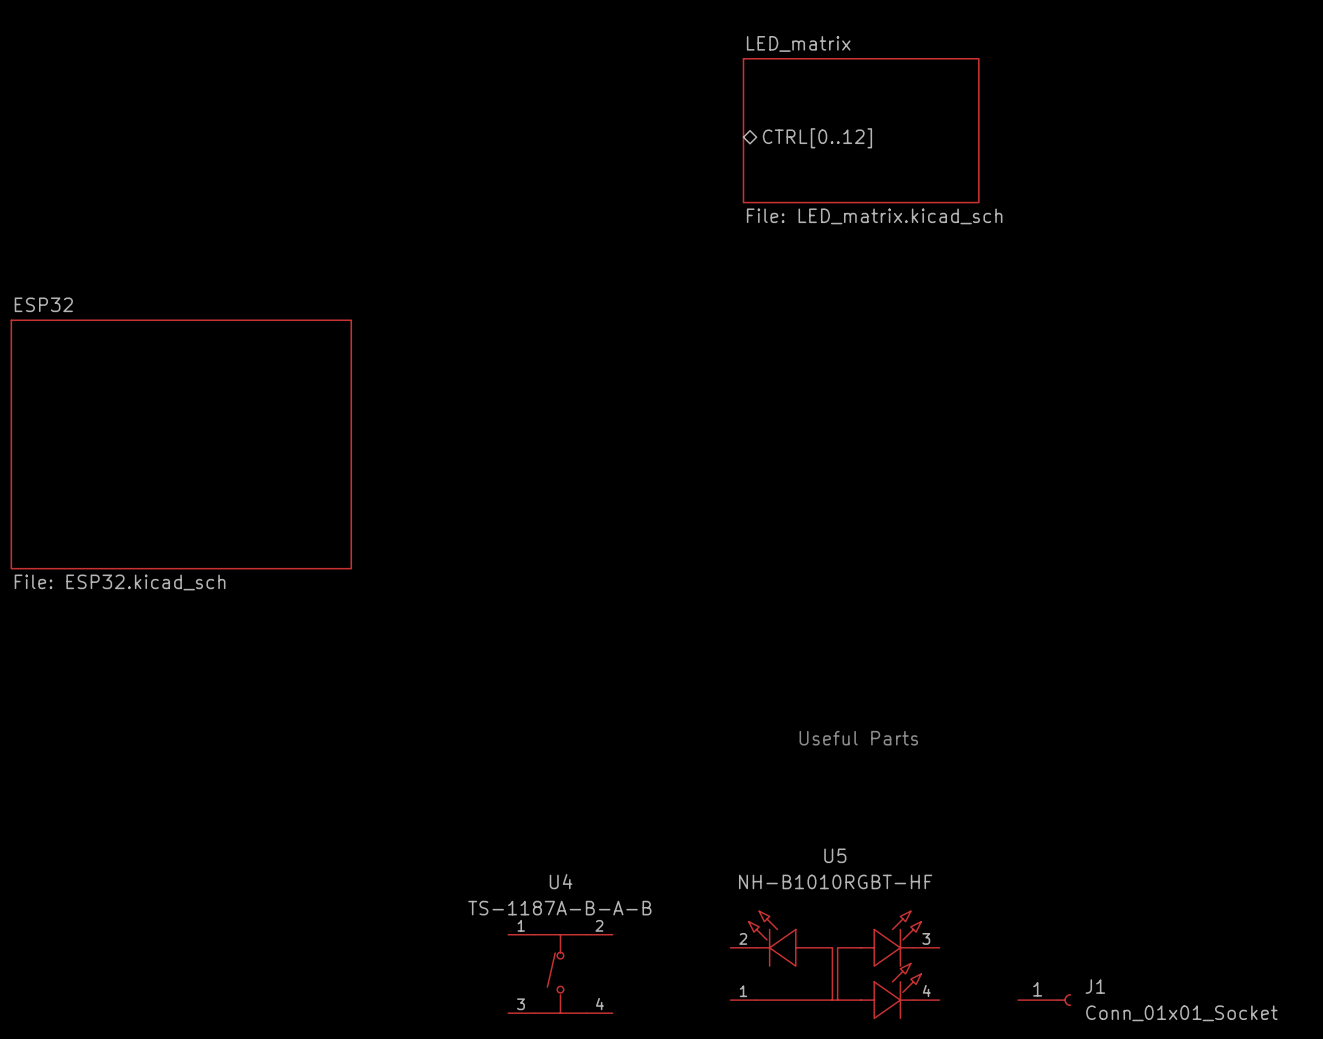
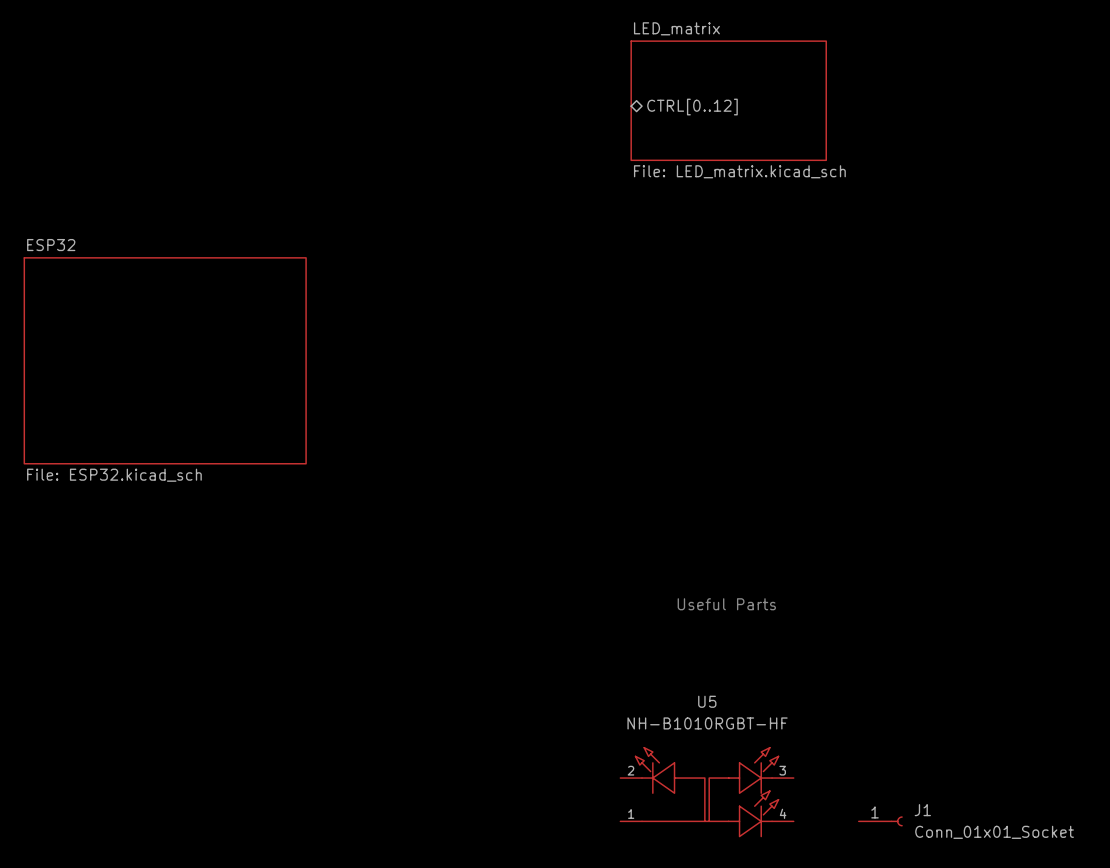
U4: TS-1187A-B-A-B (560, 973) -> none

